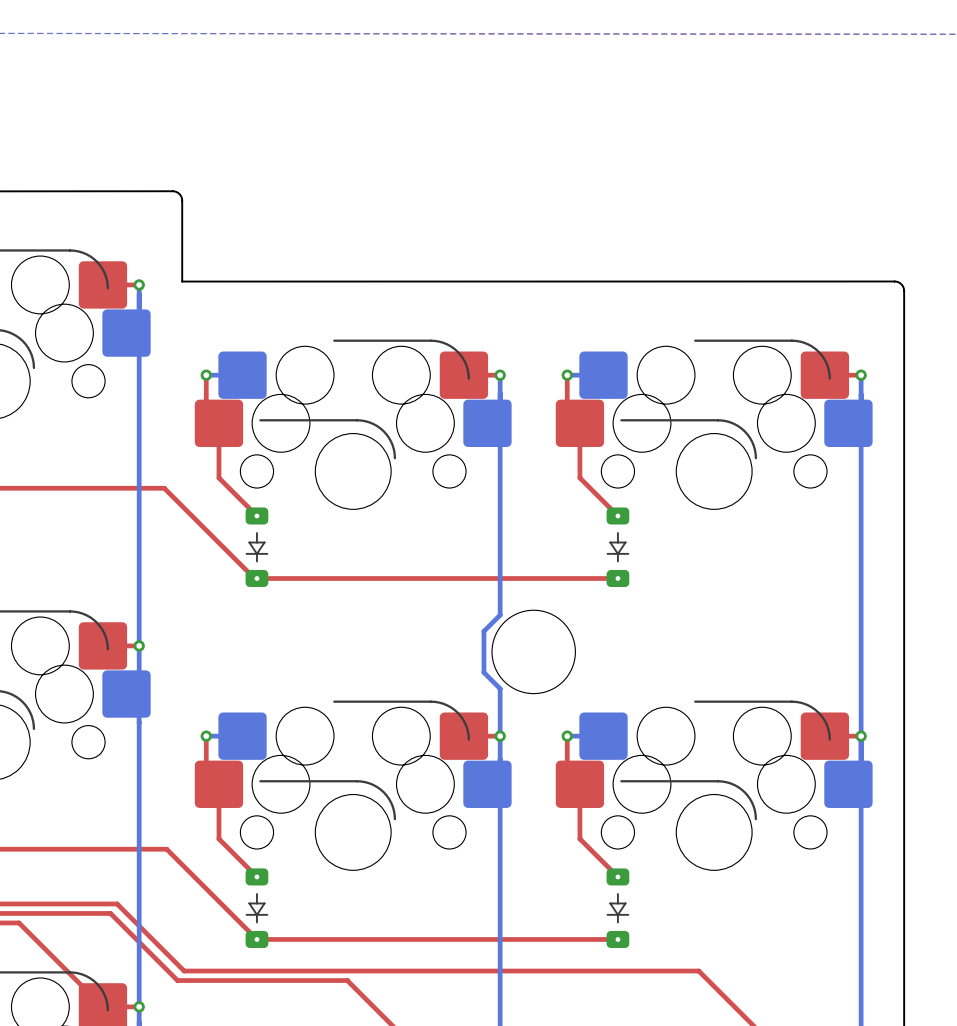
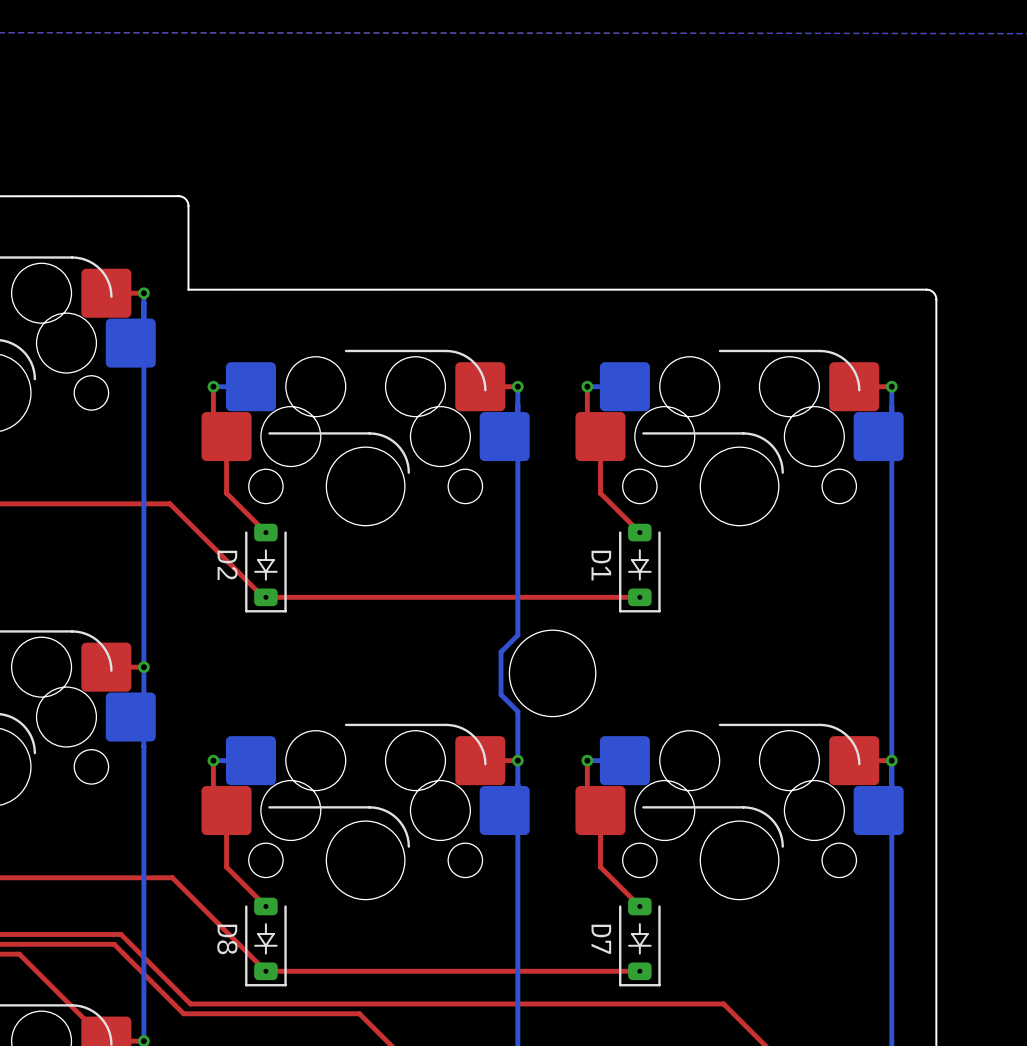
D2: none -> (265, 568)
D1: none -> (639, 568)
D8: none -> (265, 942)
D7: none -> (639, 942)

